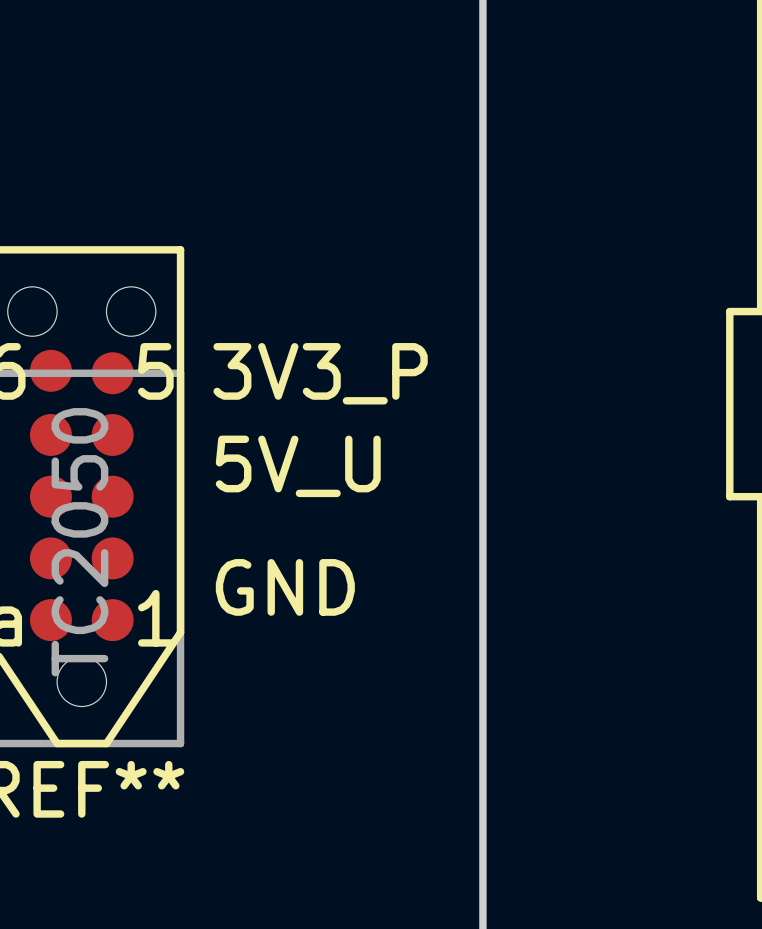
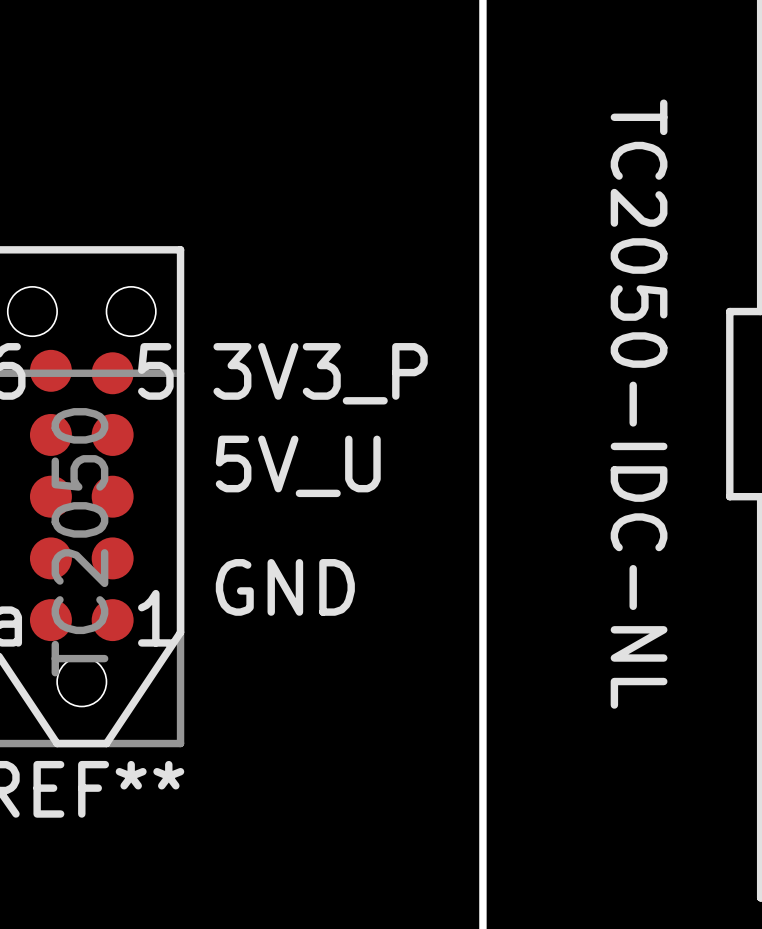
text: none -> TC2050-IDC-NL (639, 404)

